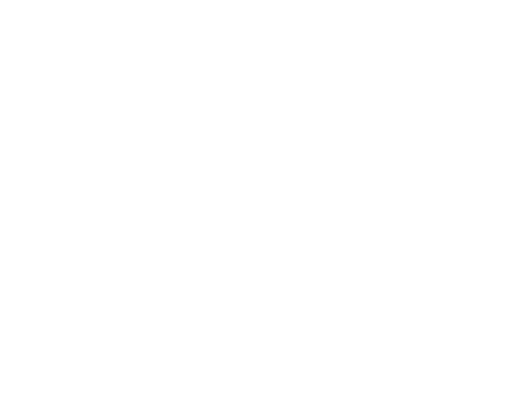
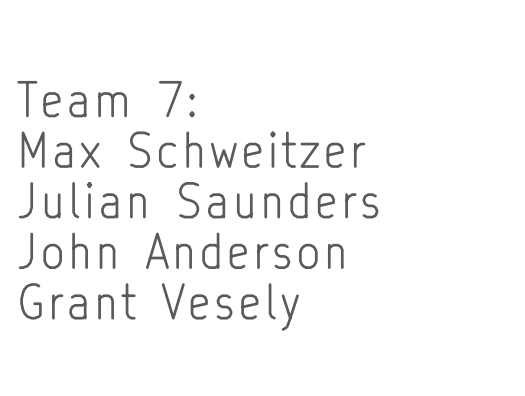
text: none -> Team 7: (106, 99)
text: none -> Max Schweitzer (193, 149)
text: none -> Julian Saunders (198, 200)
text: none -> John Anderson (181, 250)
text: none -> Grant Vesely (159, 306)

